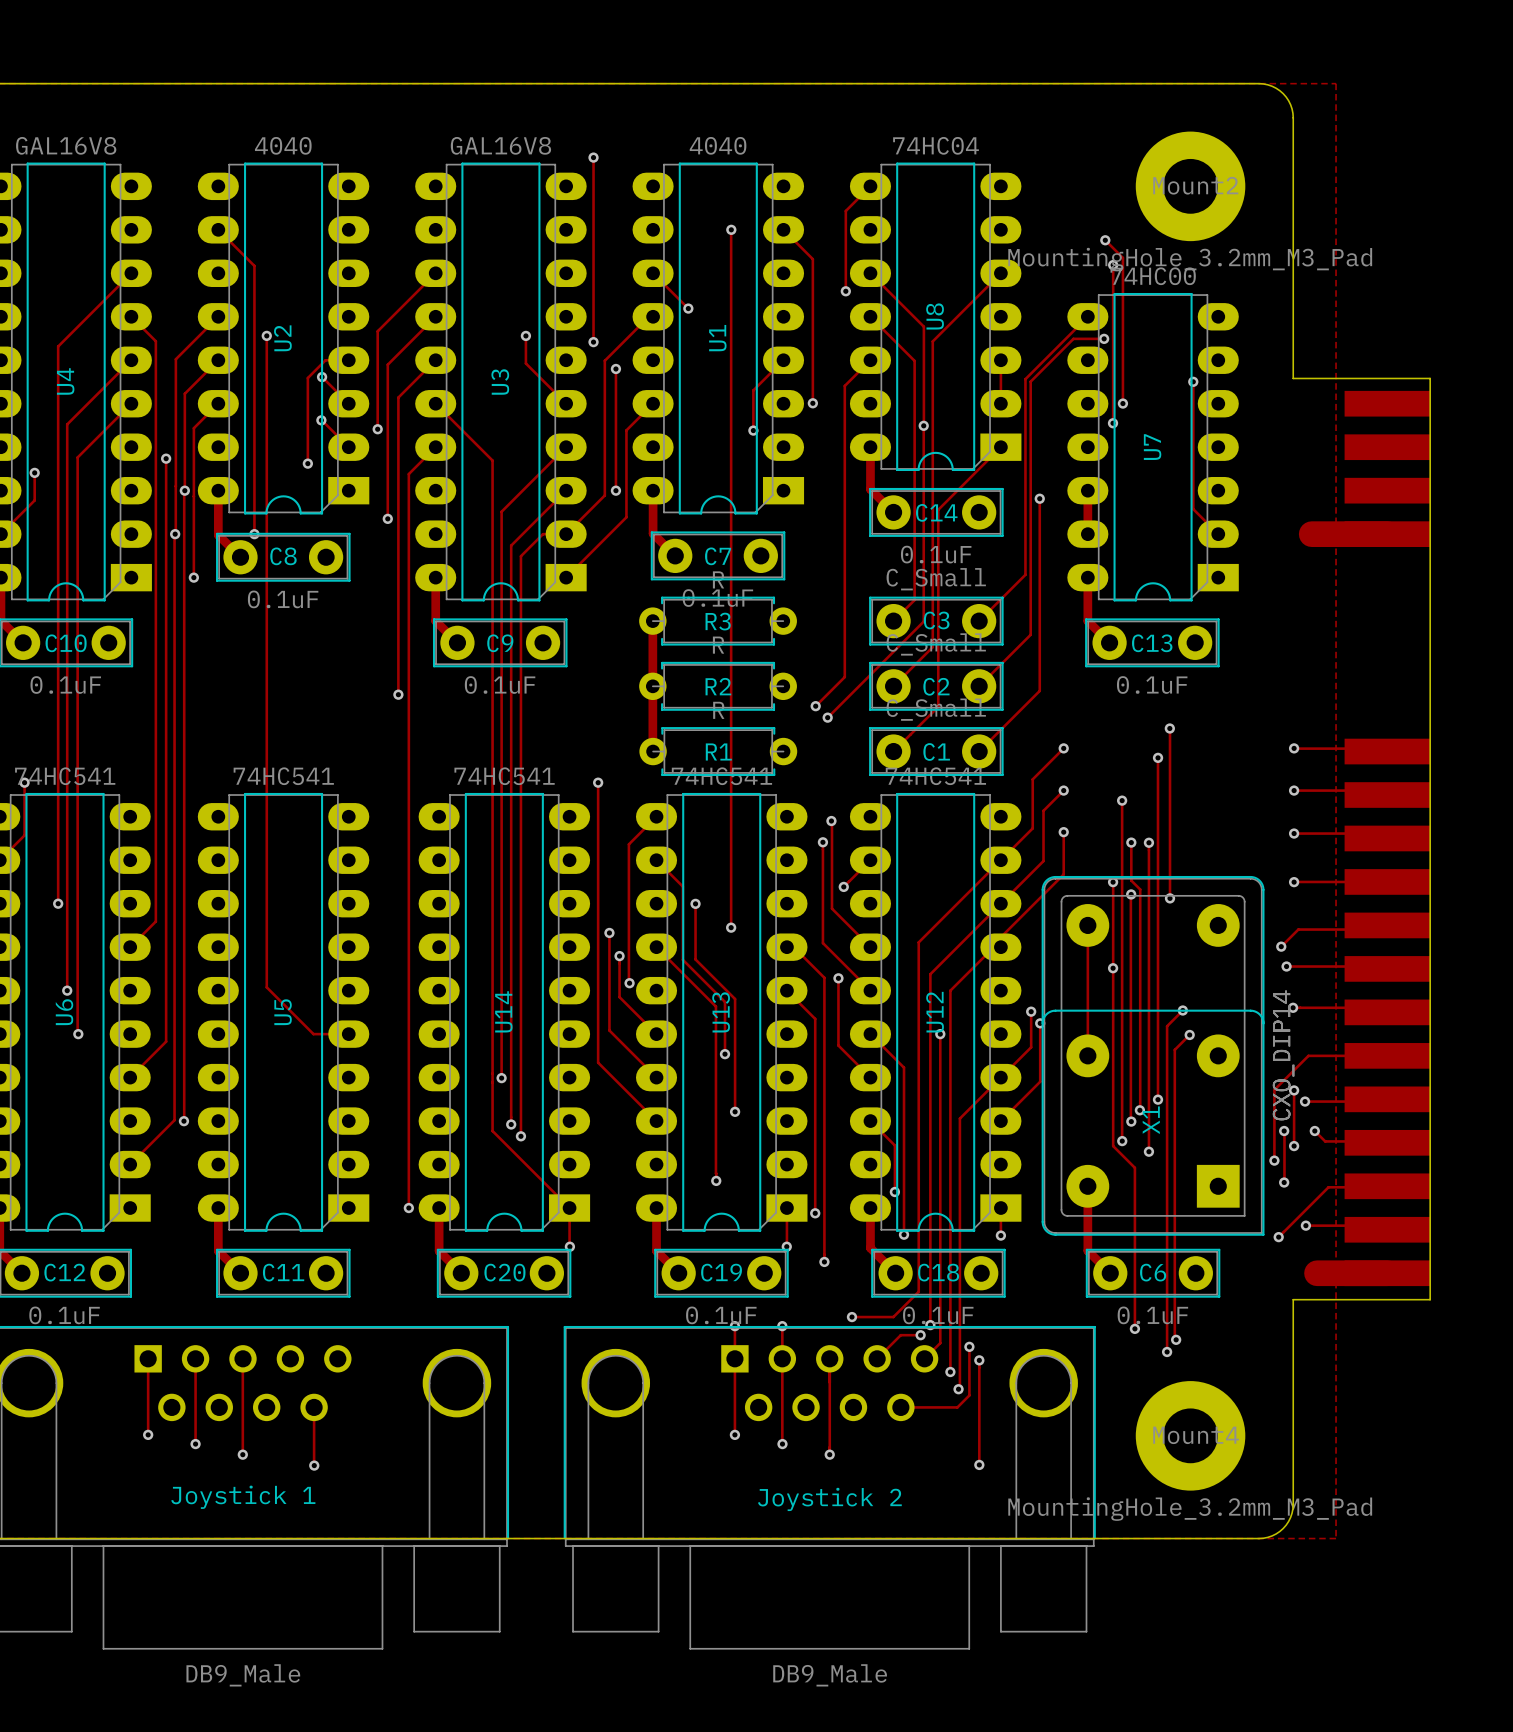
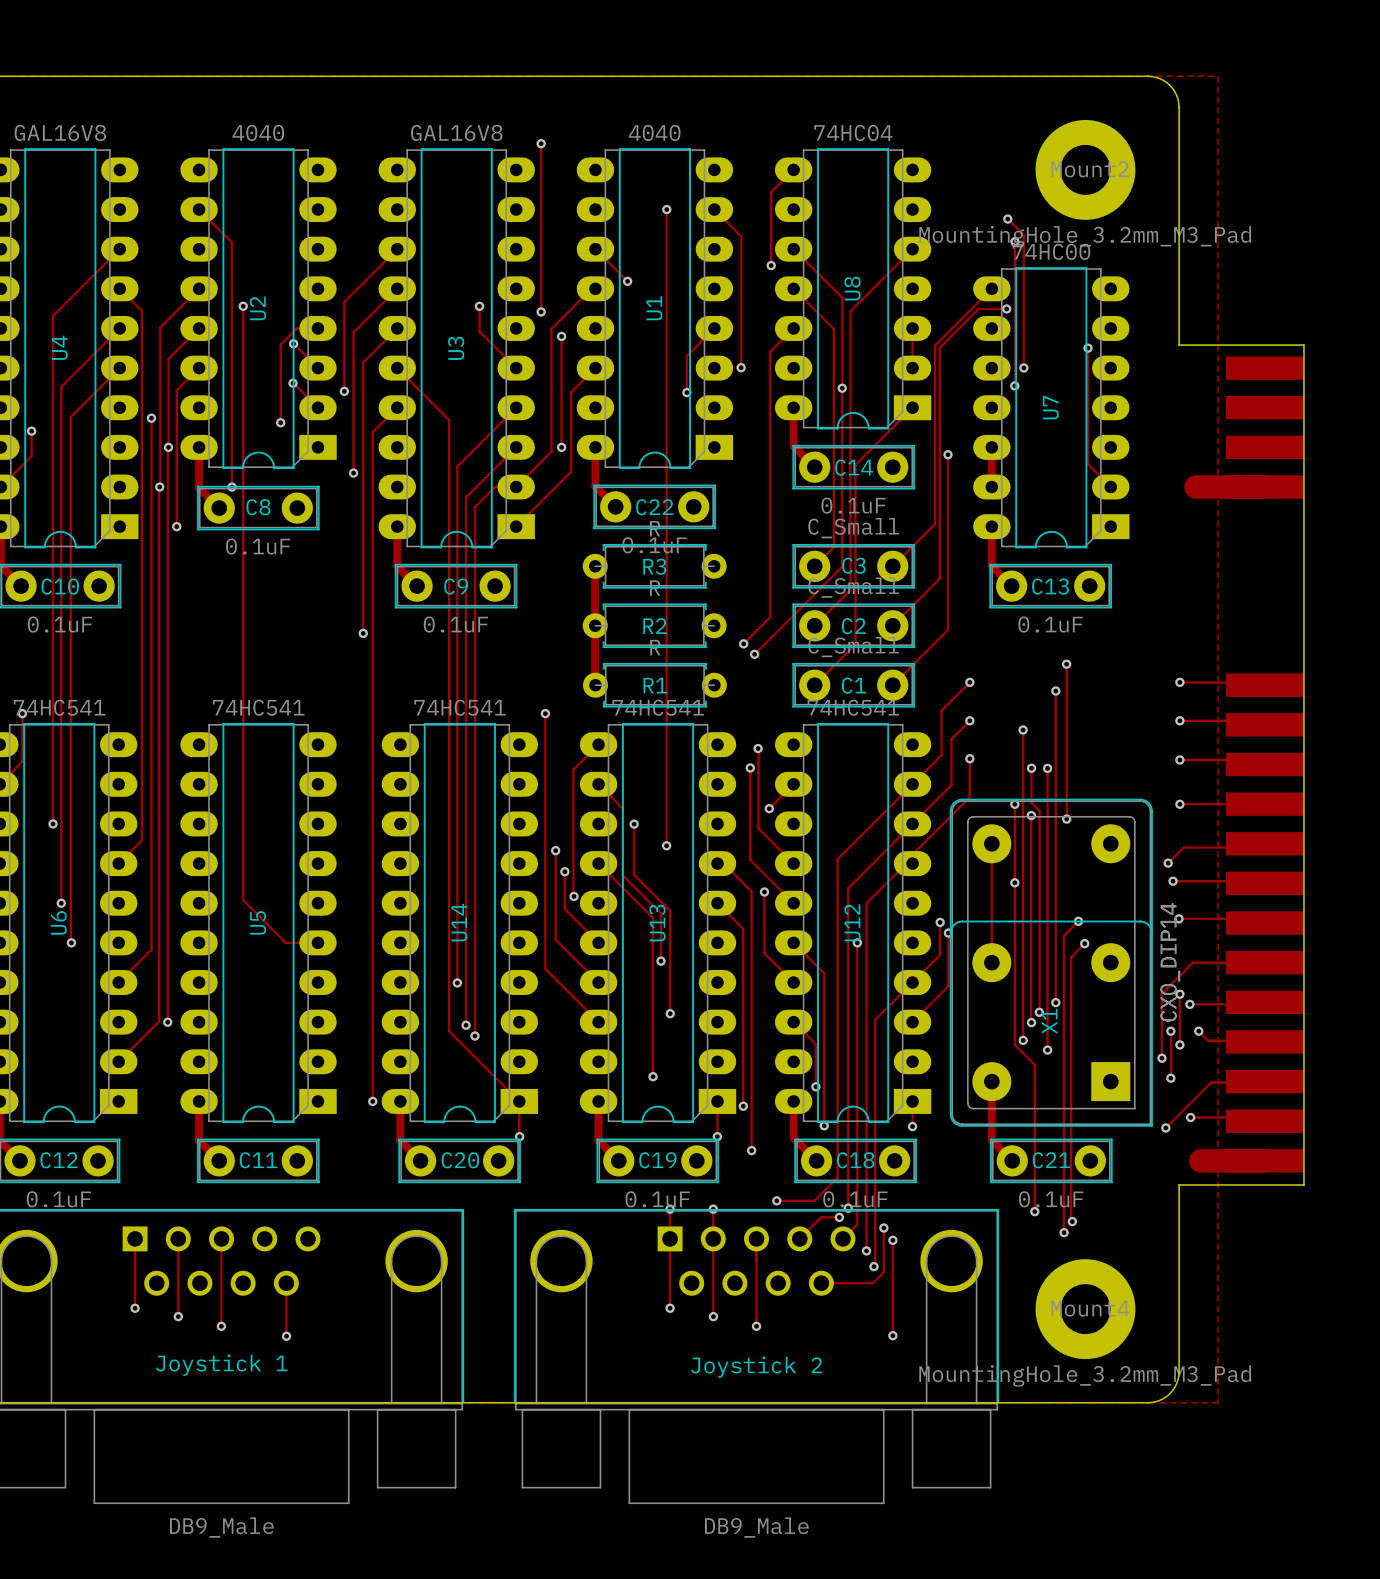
C7 name: C7 (718, 556) -> C22 (654, 507)
C6 name: C6 (1153, 1272) -> C21 (1051, 1160)

